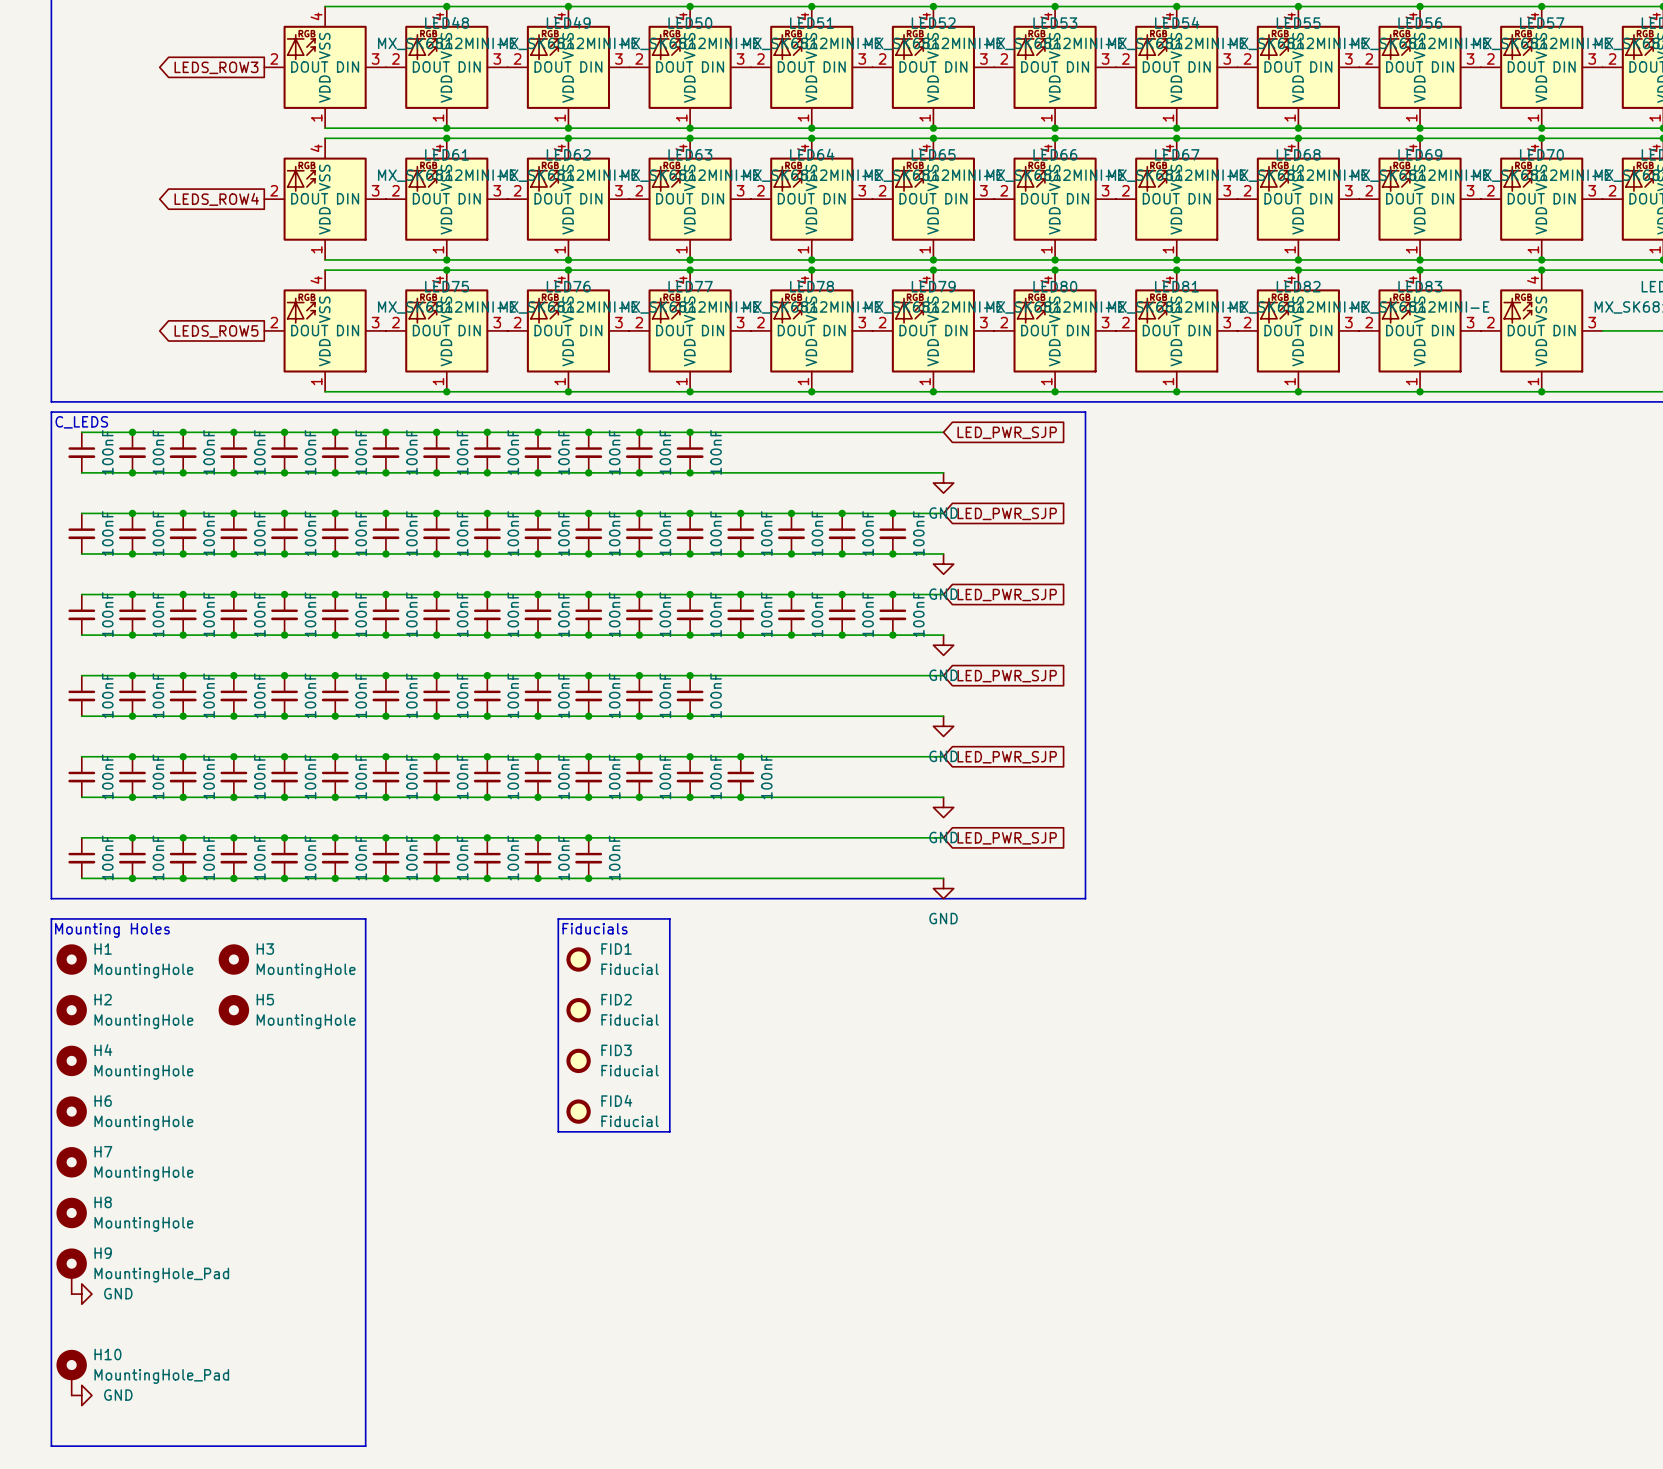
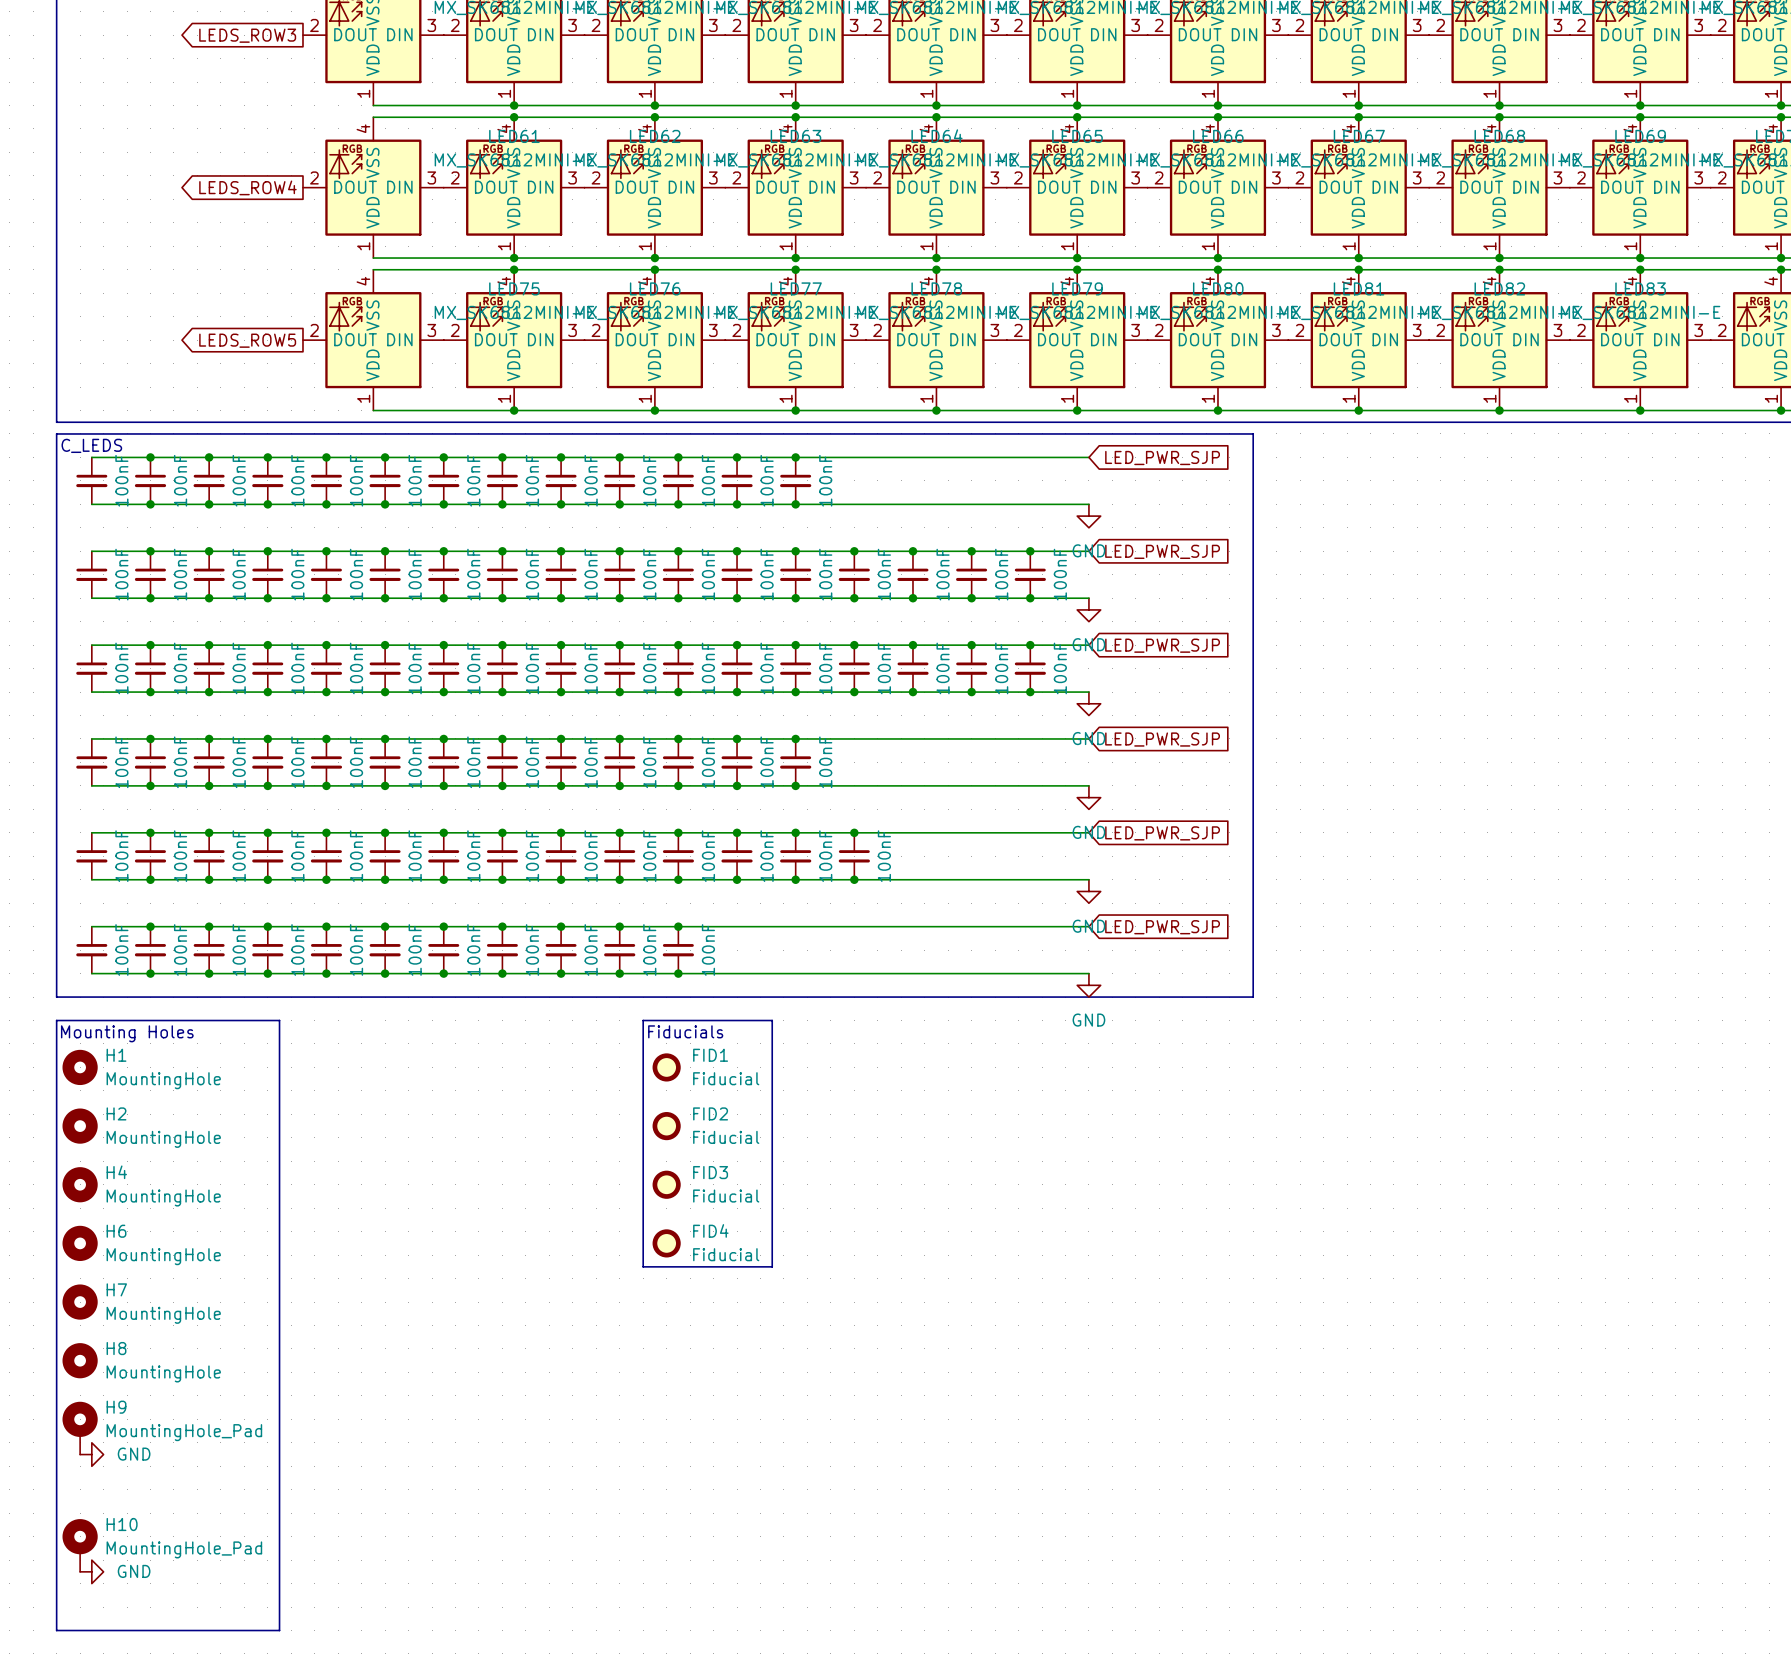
line: (244, 918) (365, 918) (365, 1446) (244, 1446) -> (279, 1020) (279, 1630)
H3: MountingHole (233, 959) -> none
H5: MountingHole (233, 1010) -> none

